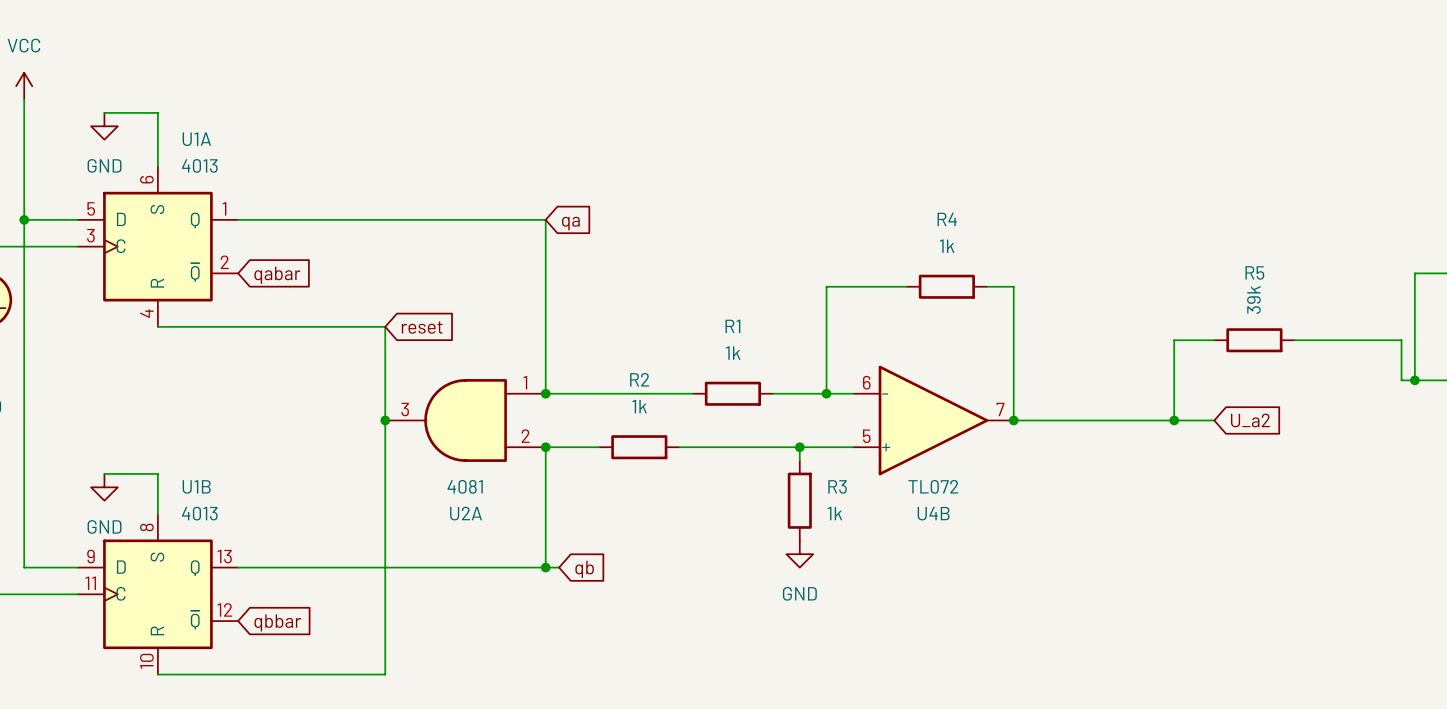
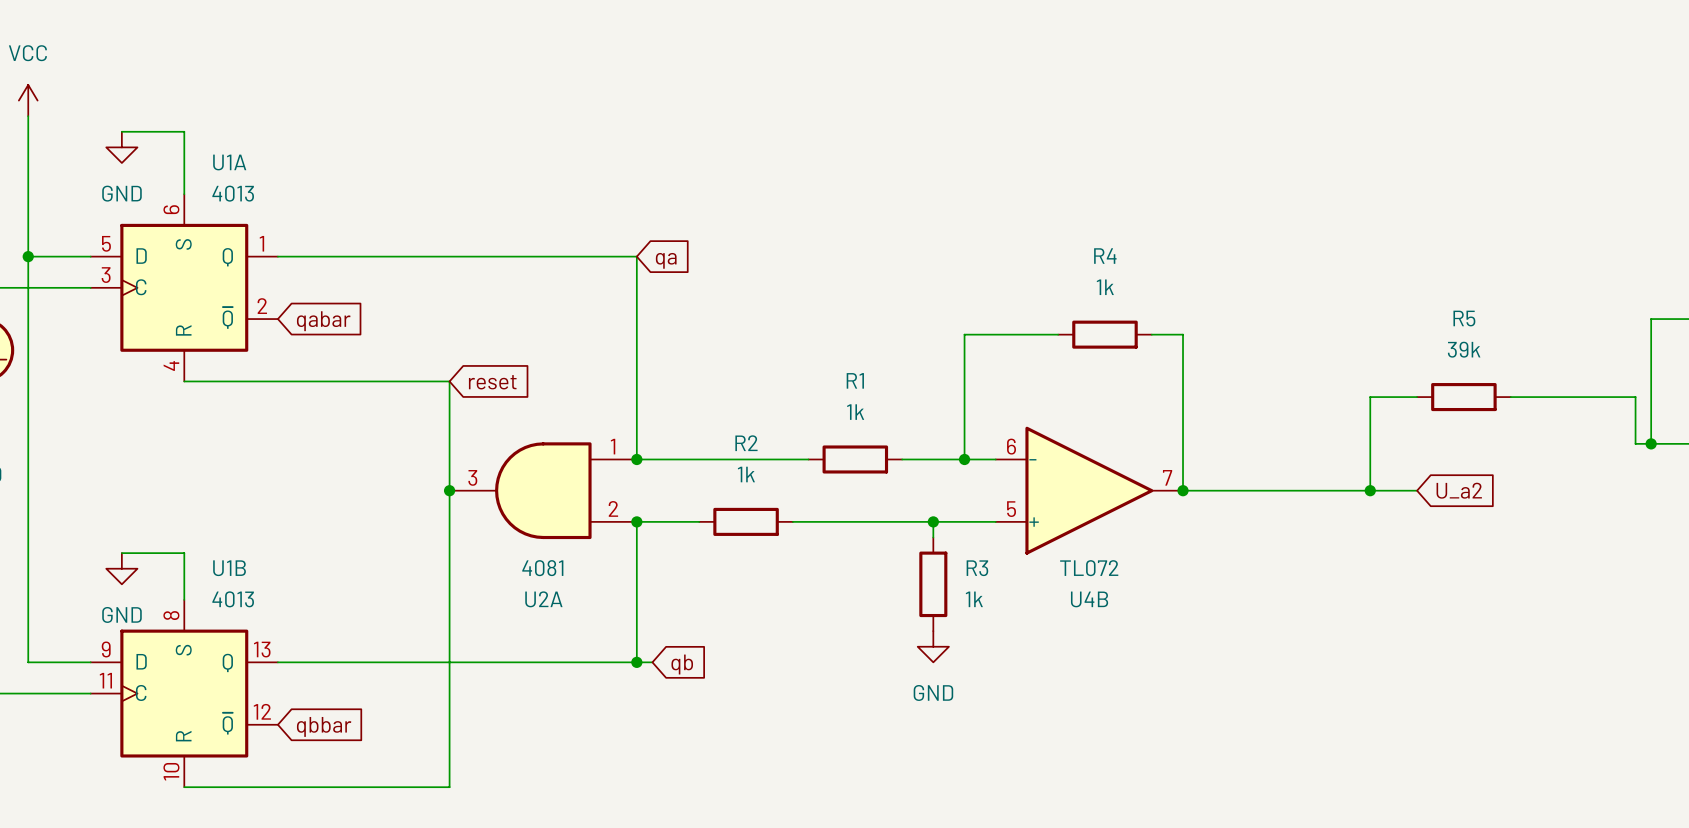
R5 value rotation: 0° (1253, 299) -> 90° clockwise (1464, 349)

